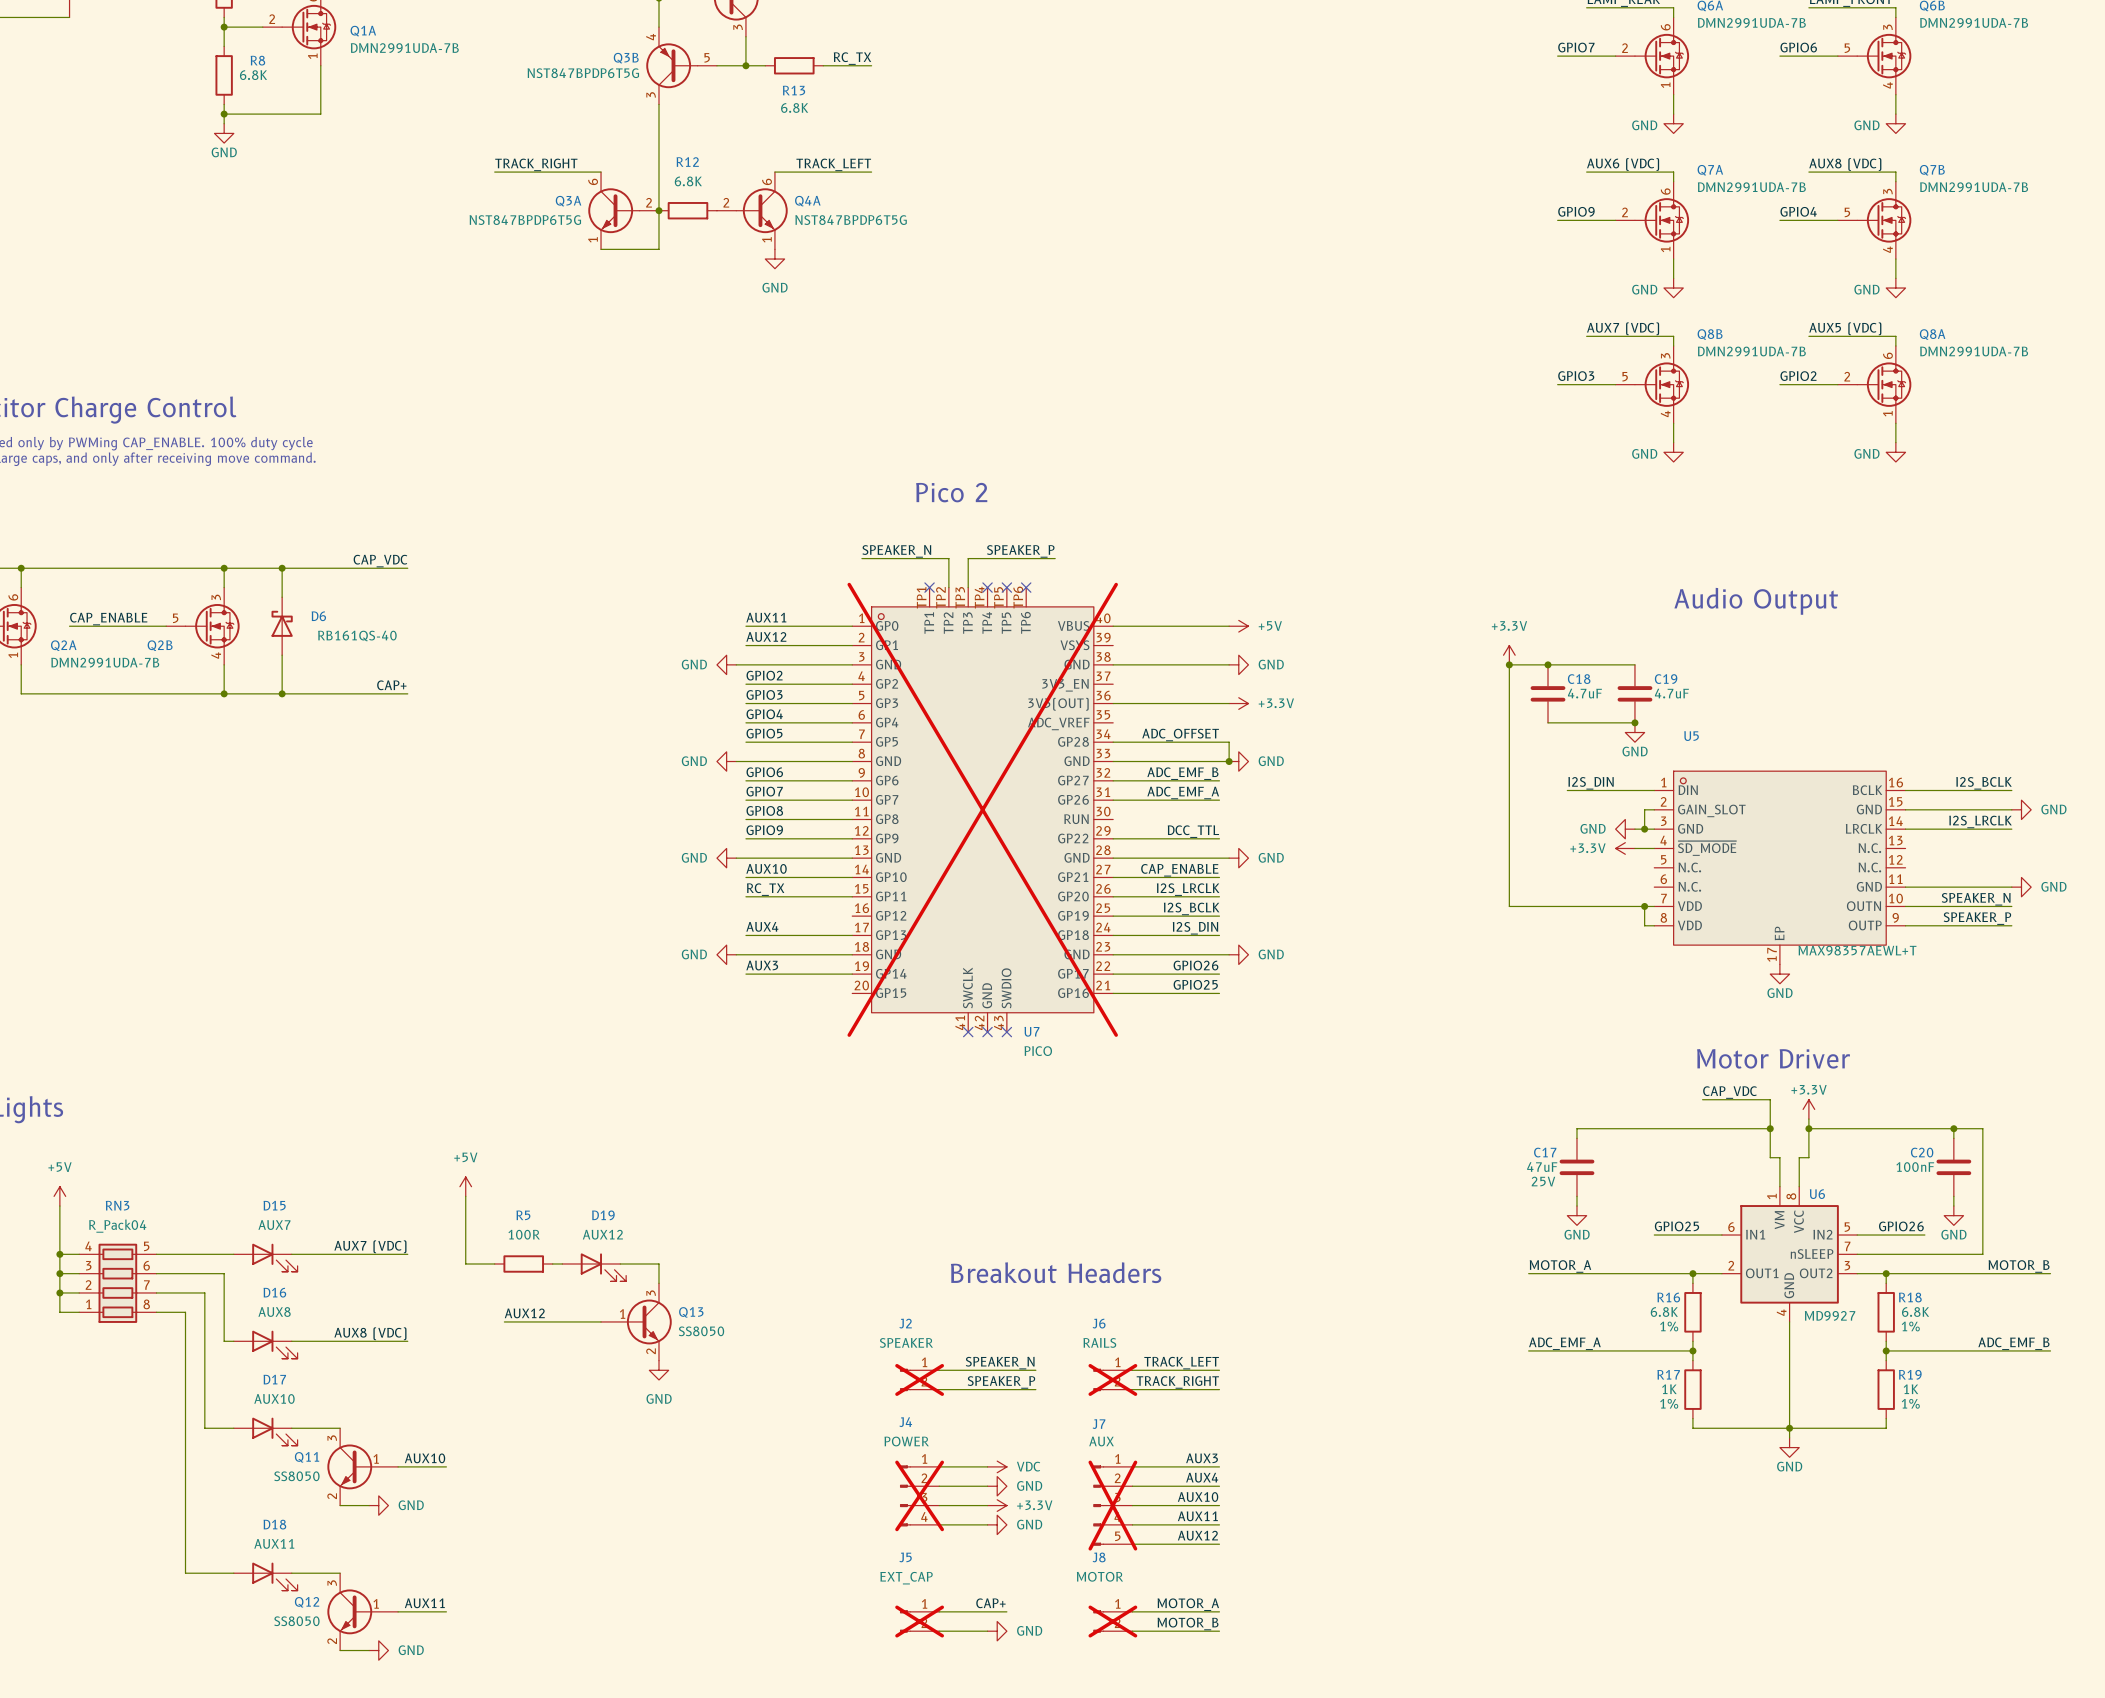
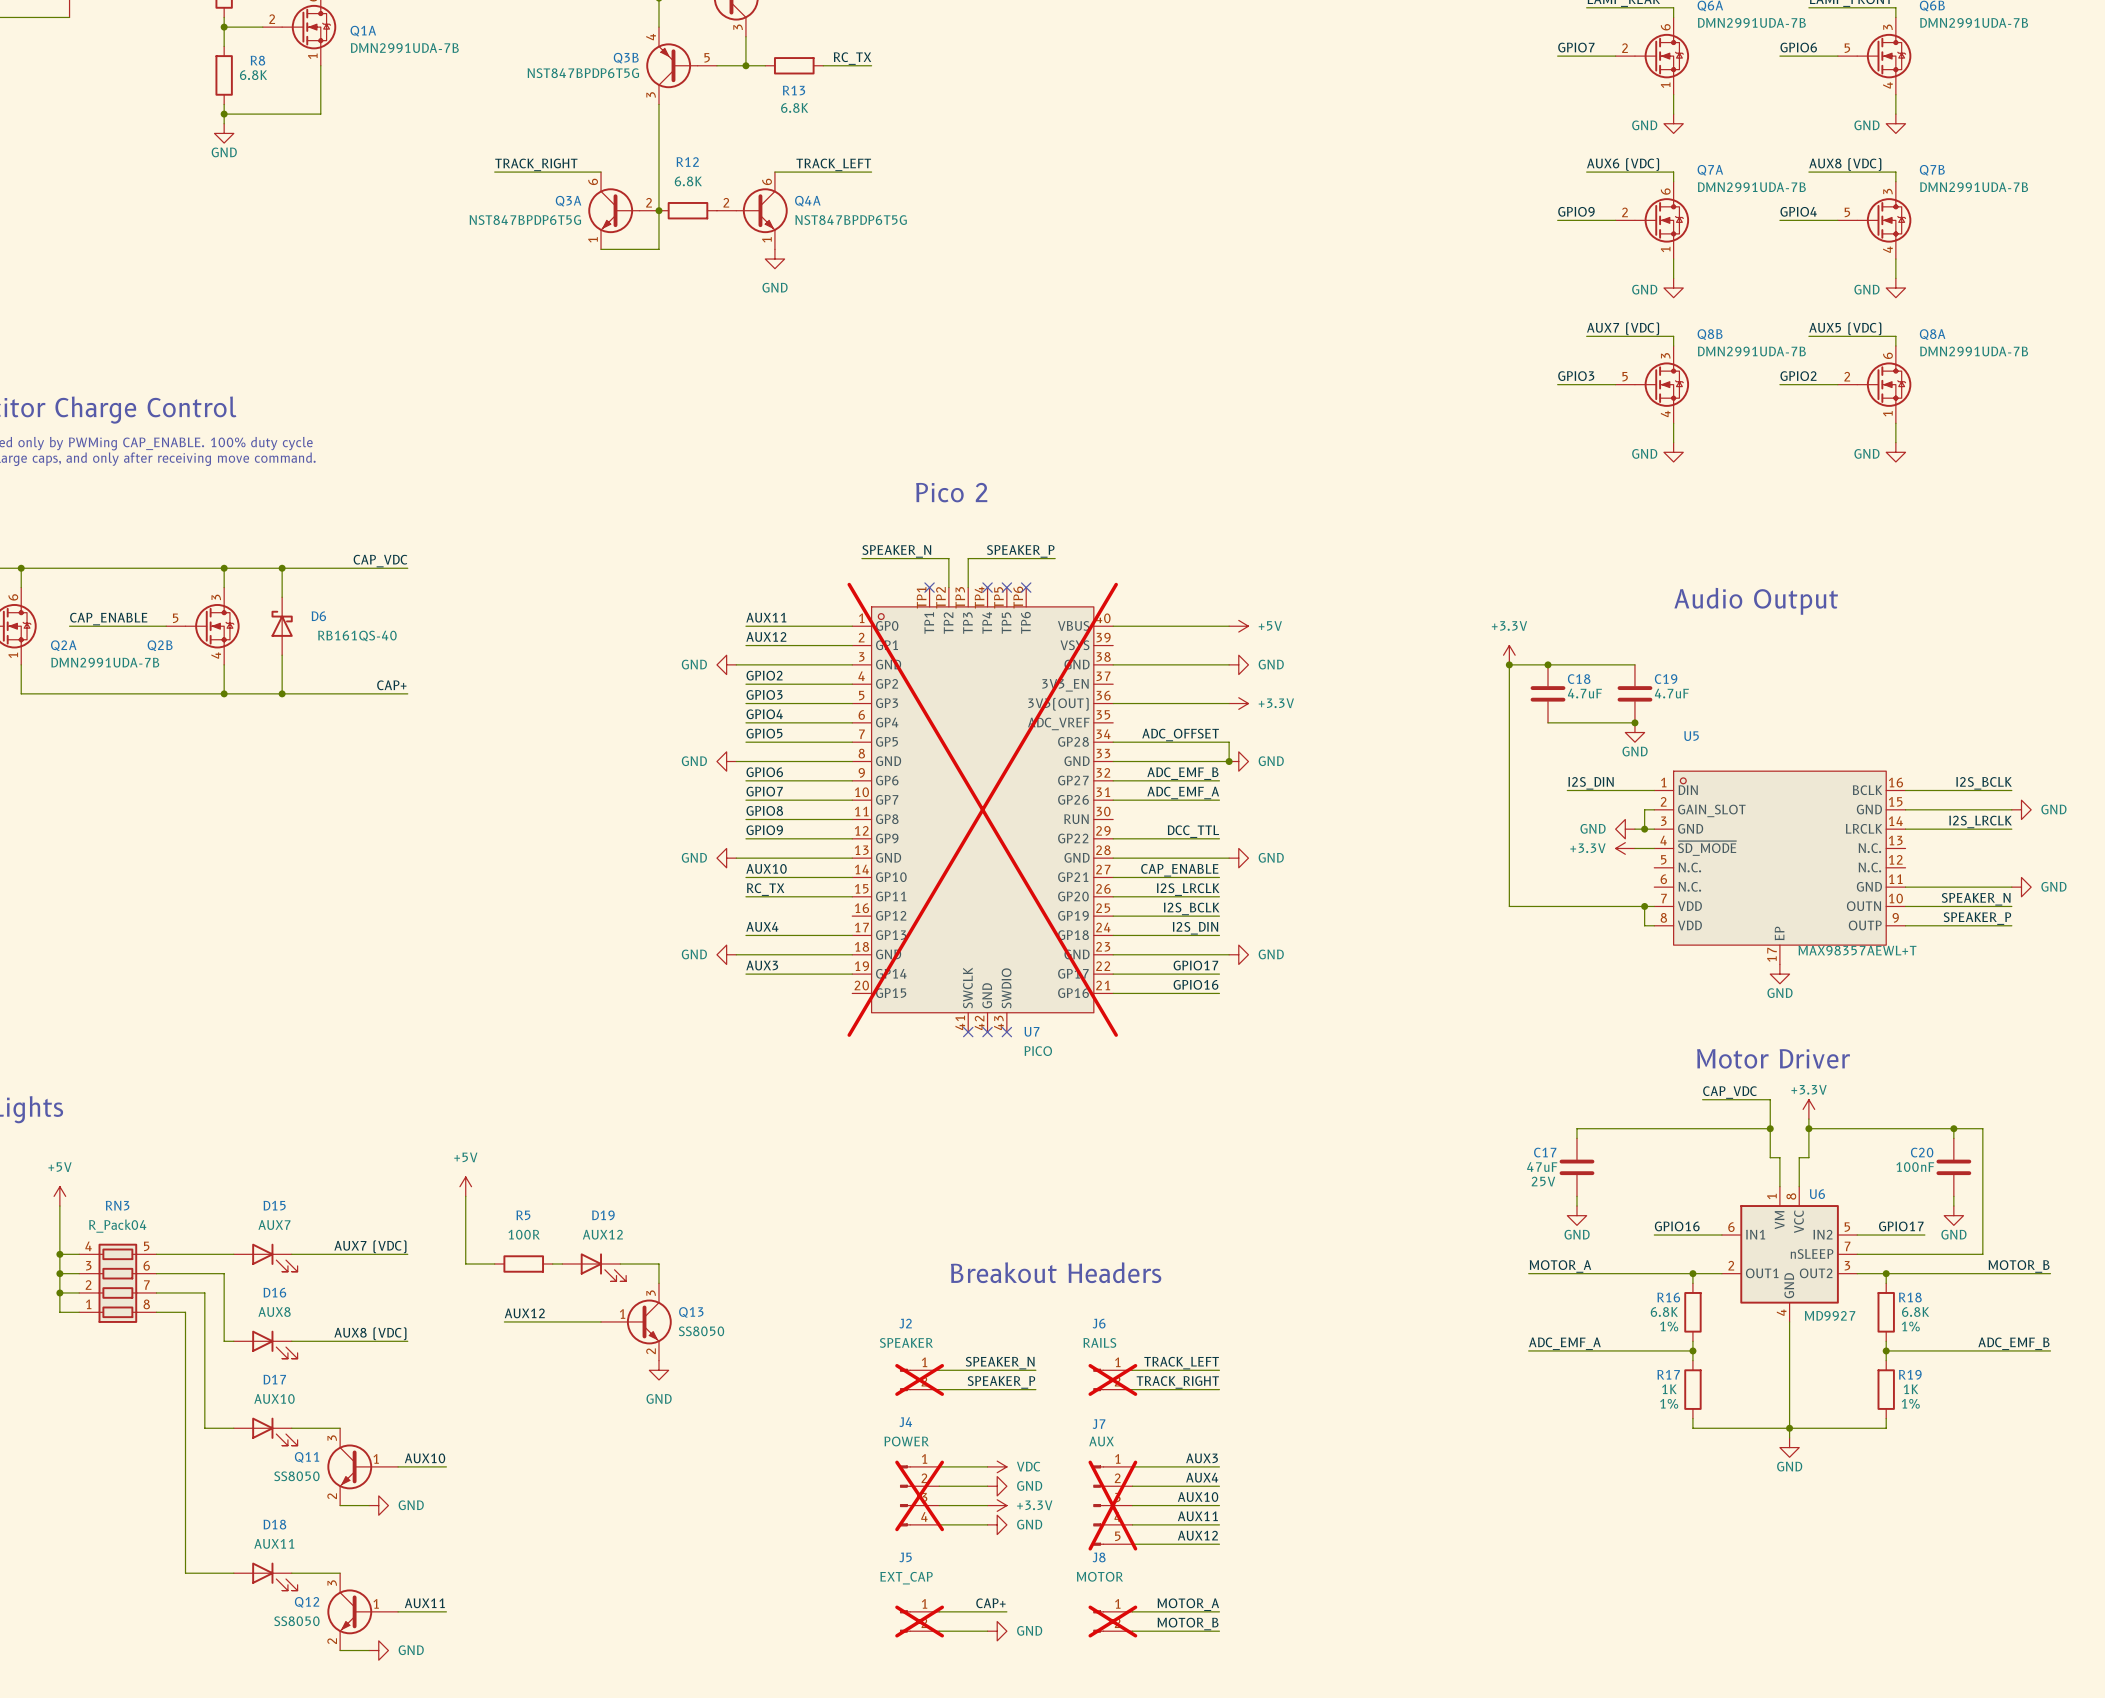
label: GPIO26 (1195, 965) -> GPIO17 (1195, 965)
label: GPIO25 (1195, 984) -> GPIO16 (1195, 984)
label: GPIO25 (1676, 1226) -> GPIO16 (1677, 1226)
label: GPIO26 (1901, 1226) -> GPIO17 (1901, 1226)

